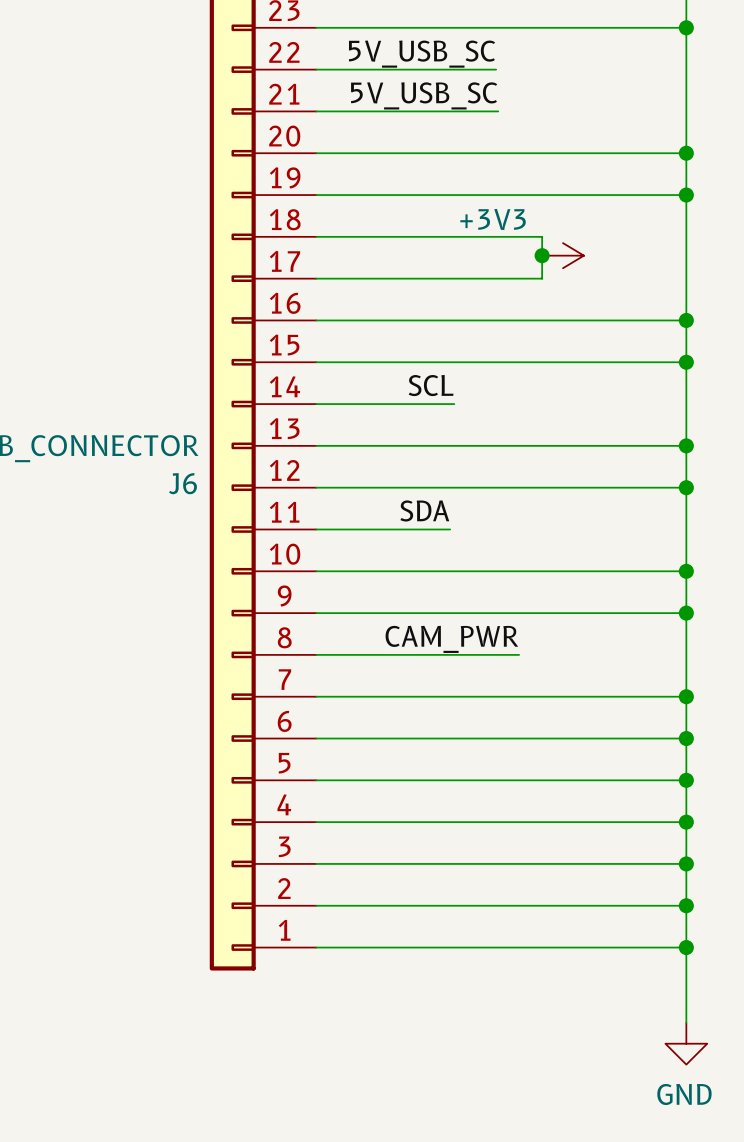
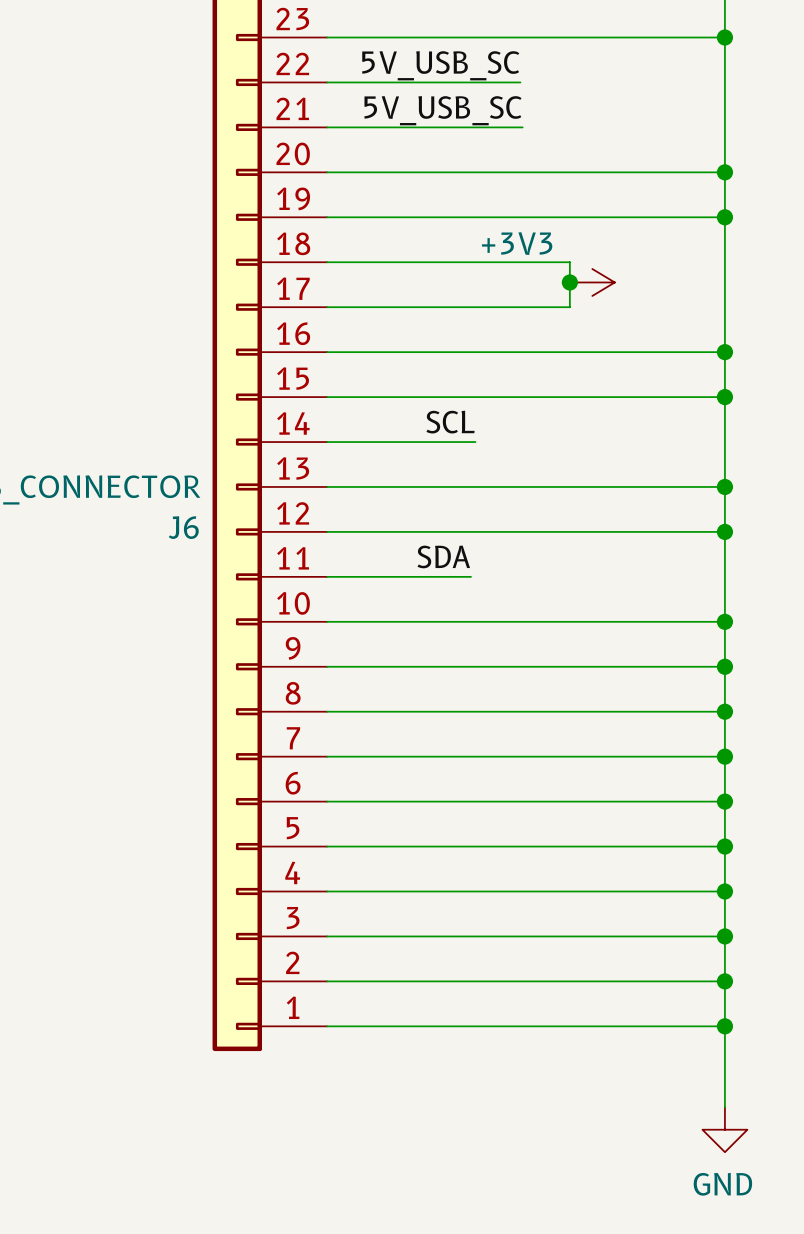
label: CAM_PWR (451, 639) -> none
wire: none -> (545, 711) (724, 711)
junction: none -> (724, 711)

